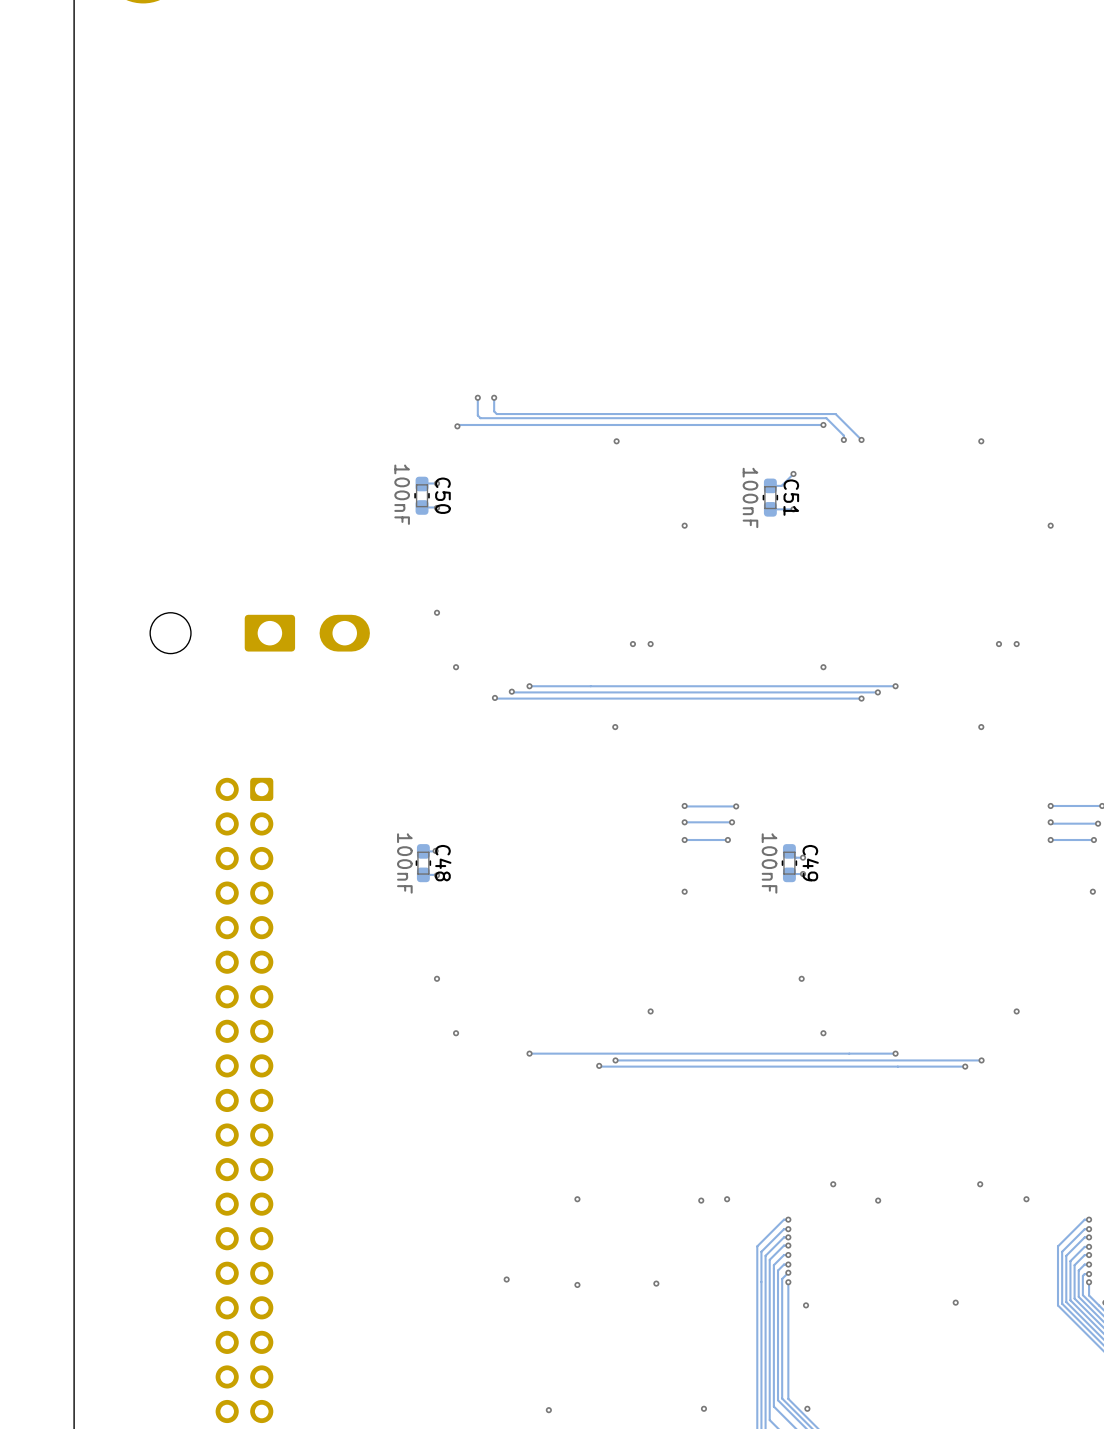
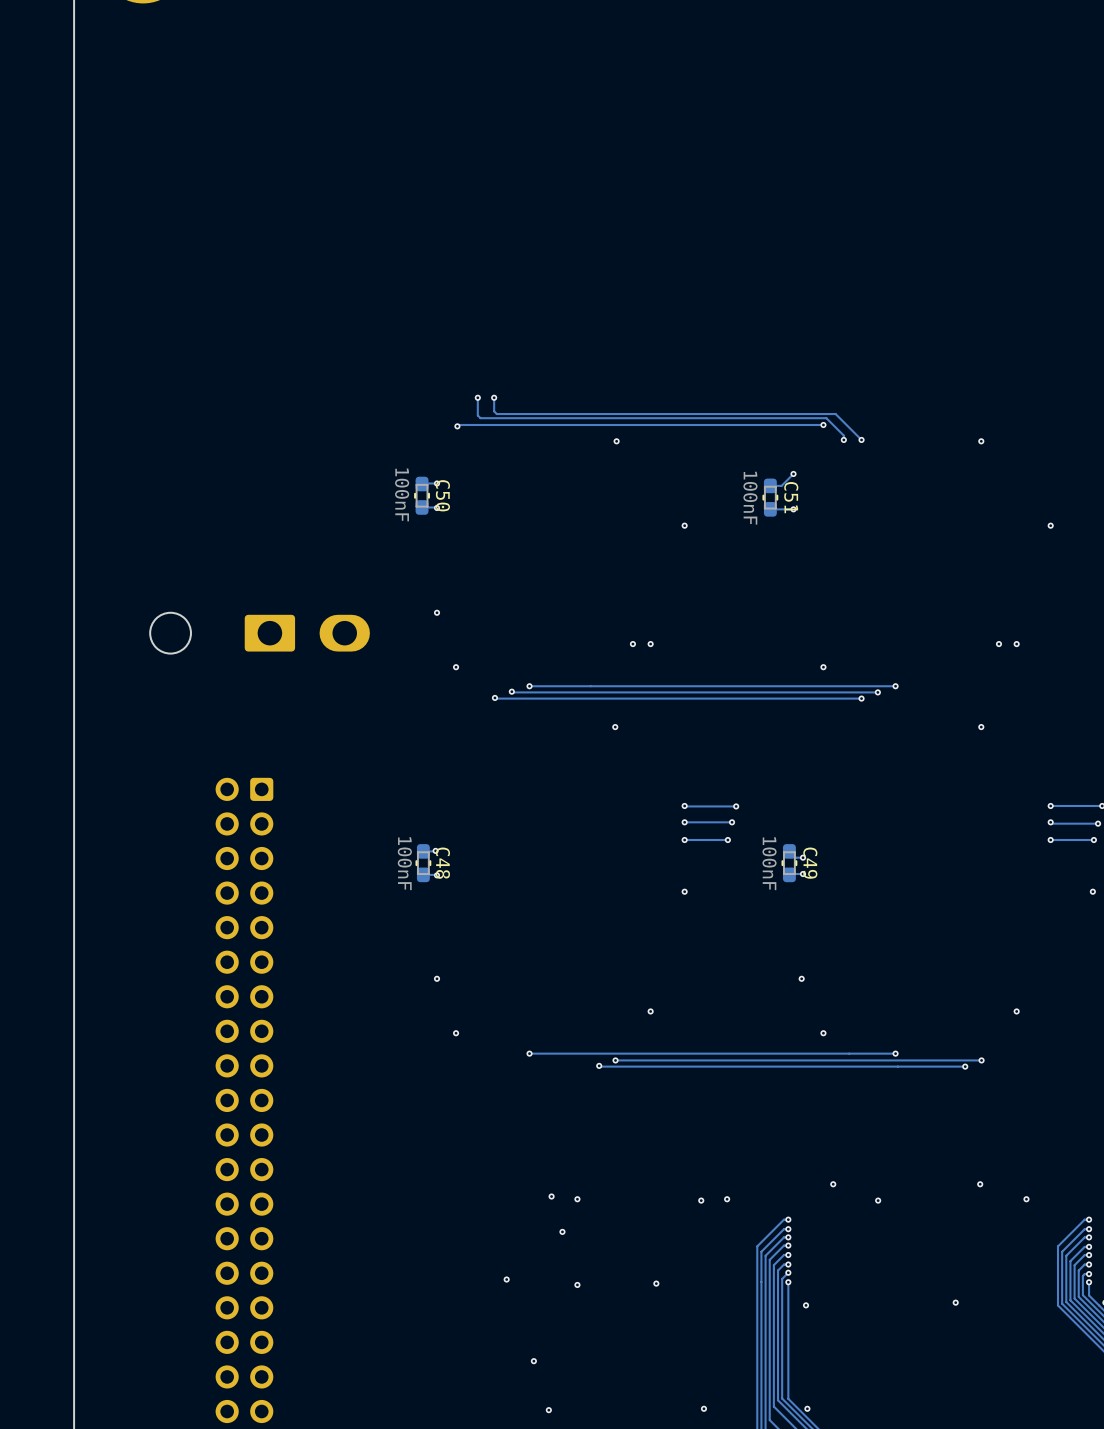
via: none -> (551, 1196)
via: none -> (562, 1231)
via: none -> (533, 1361)

